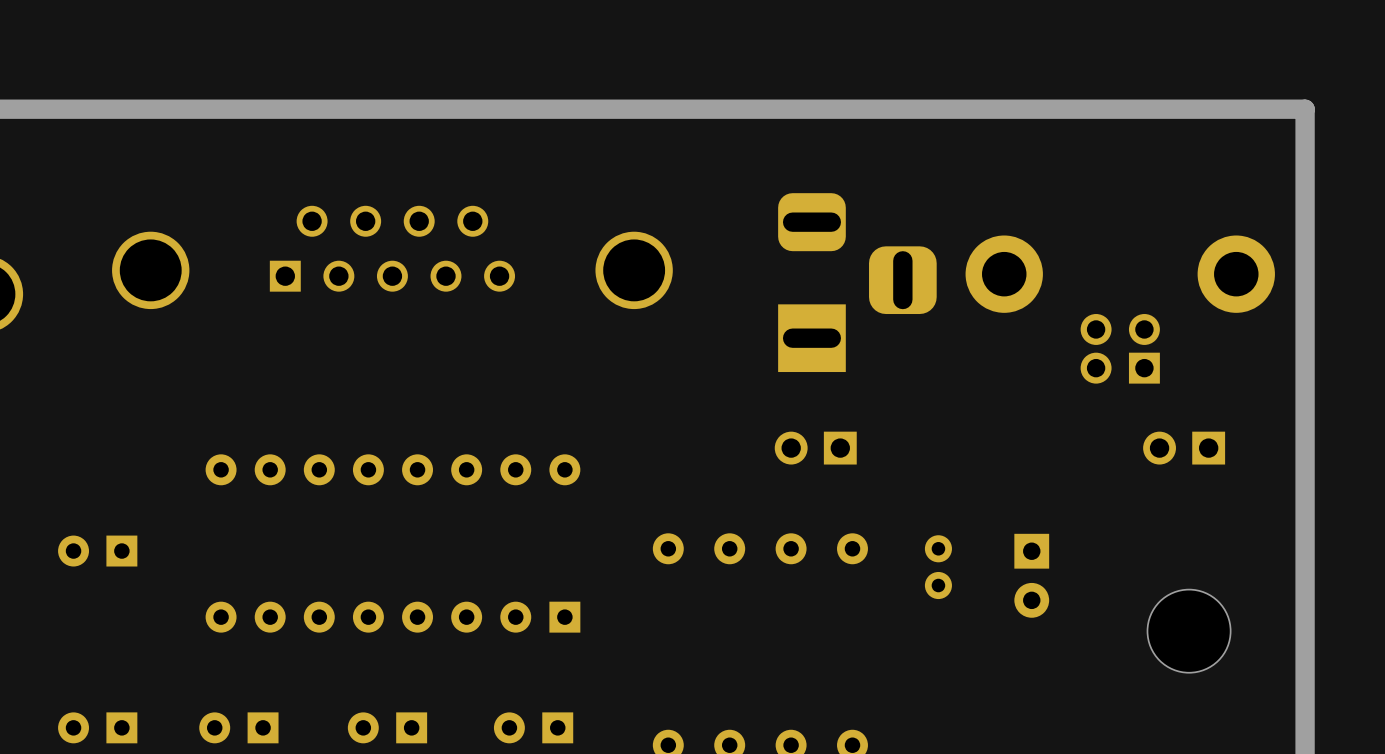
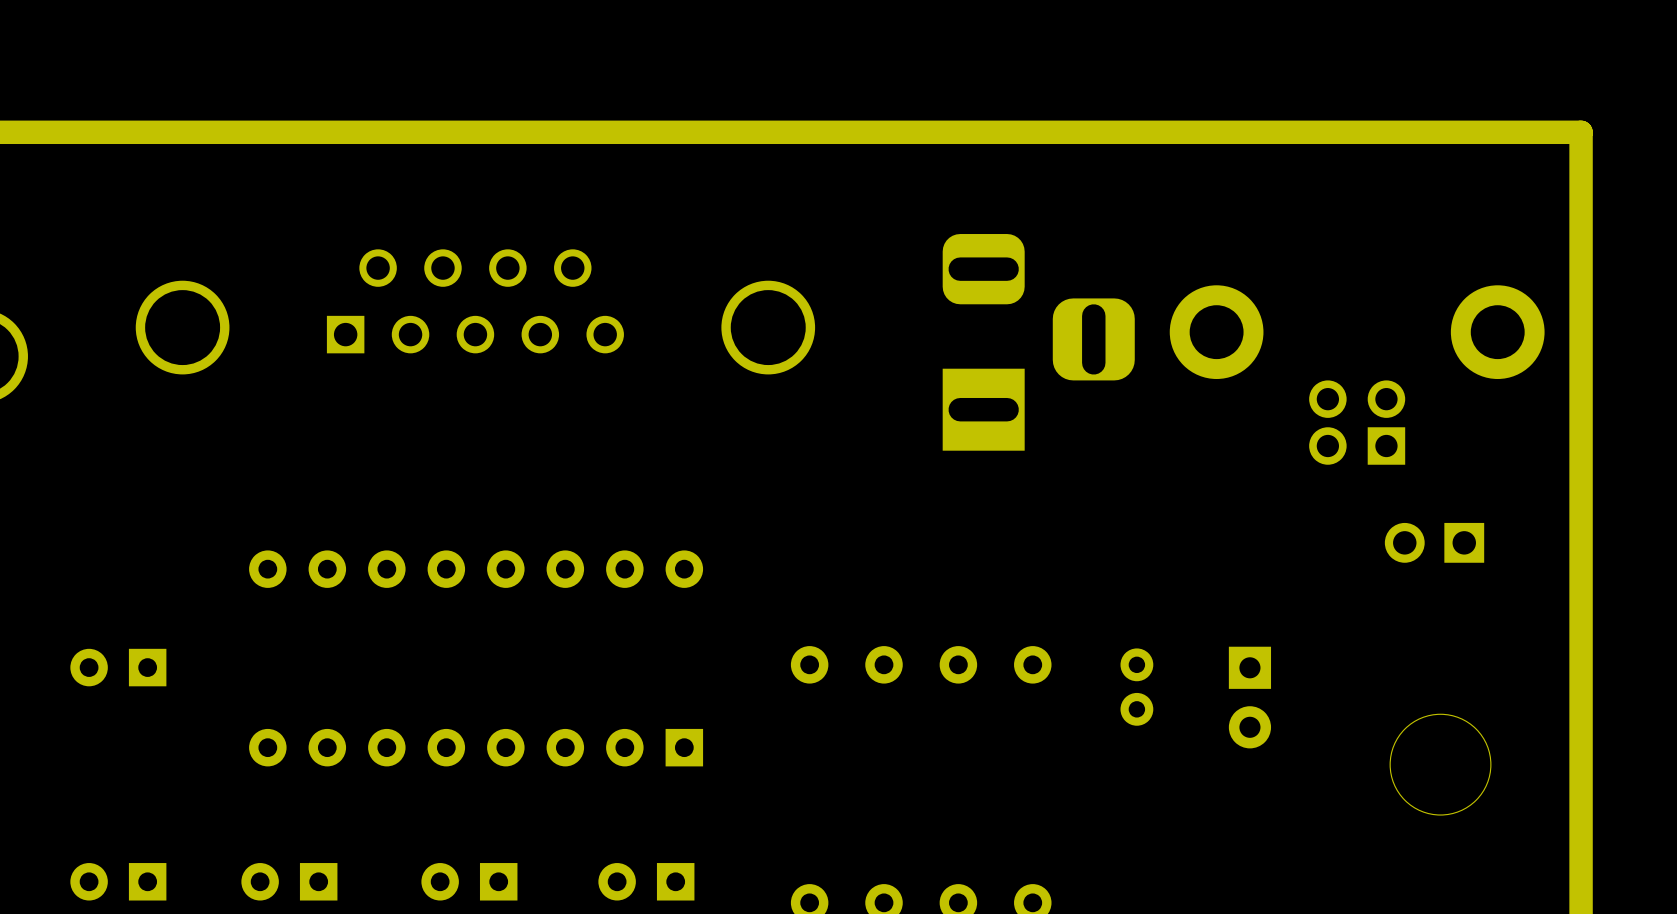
part: (815, 448) -> none

